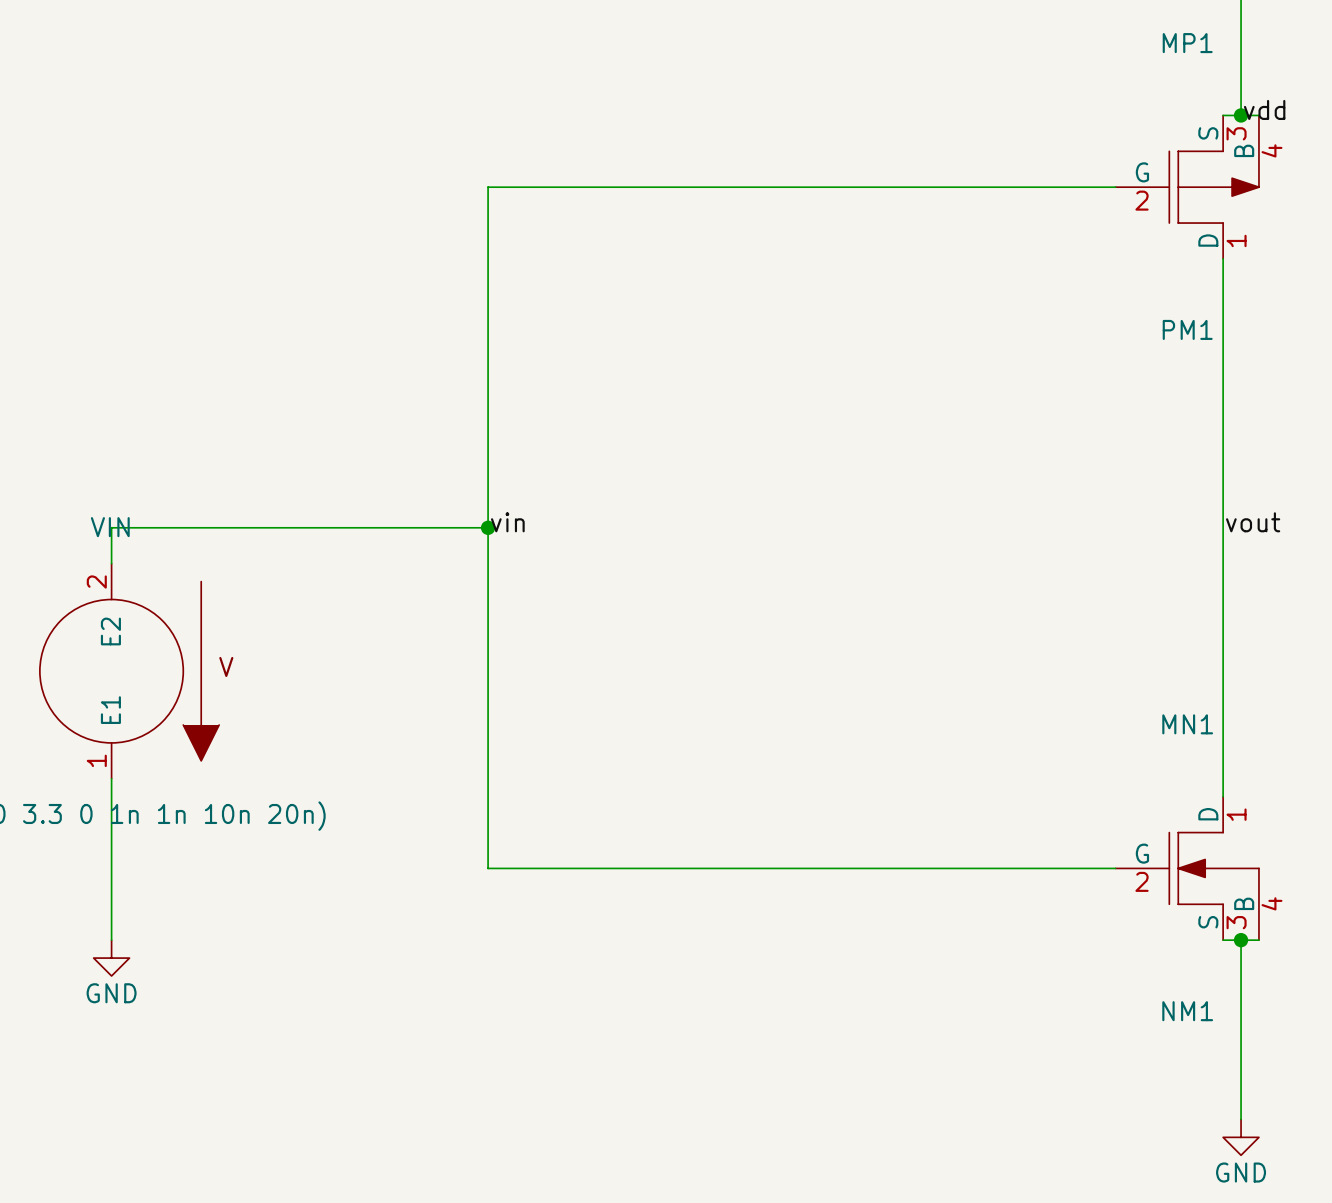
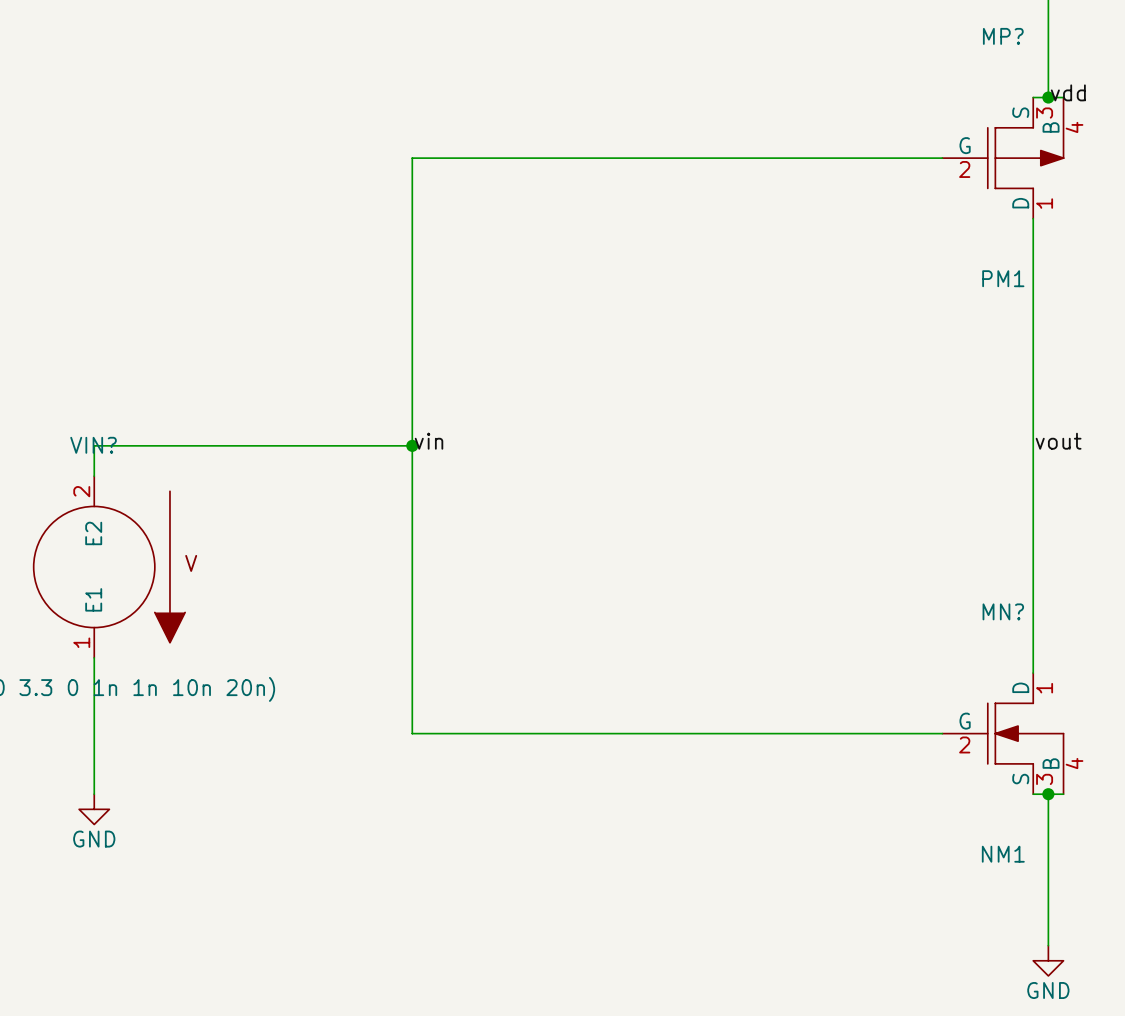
MP1 name: MP1 (1187, 43) -> MP? (1003, 36)
VIN name: VIN (110, 527) -> VIN? (93, 445)
MN1 name: MN1 (1187, 724) -> MN? (1003, 611)

